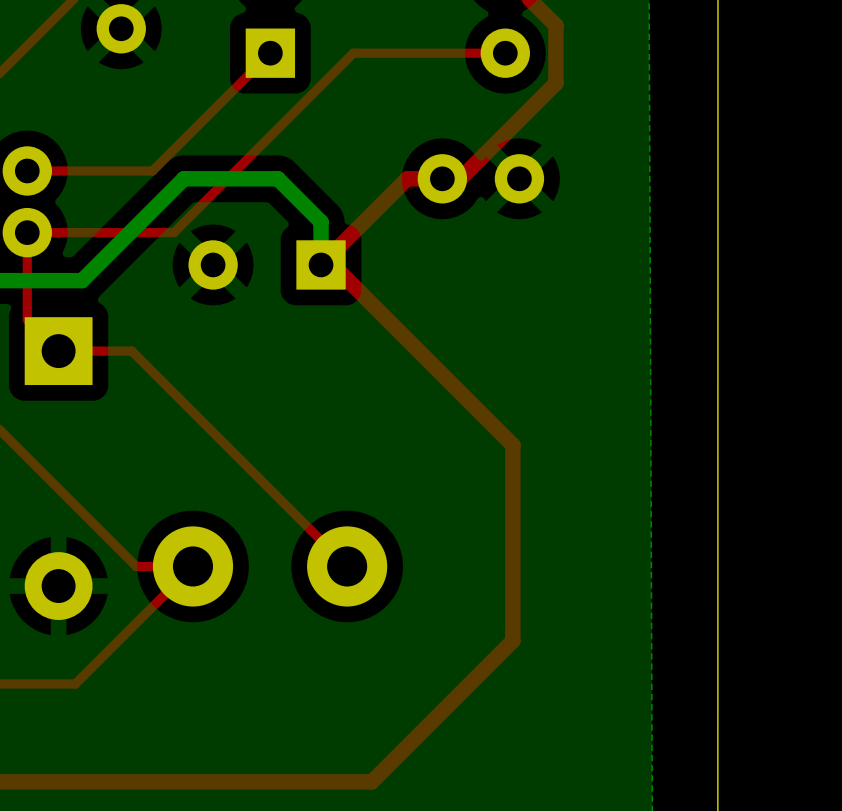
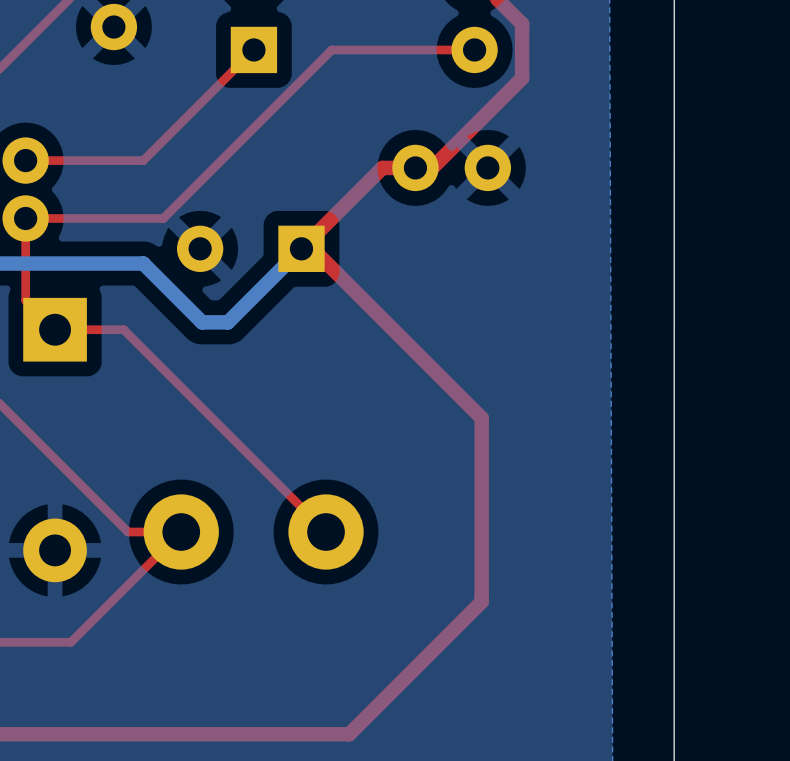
bottom track: (321, 264) (321, 221) (277, 178) (183, 178) (82, 280) -> (301, 248) (227, 322) (202, 322) (143, 263) (77, 263)

